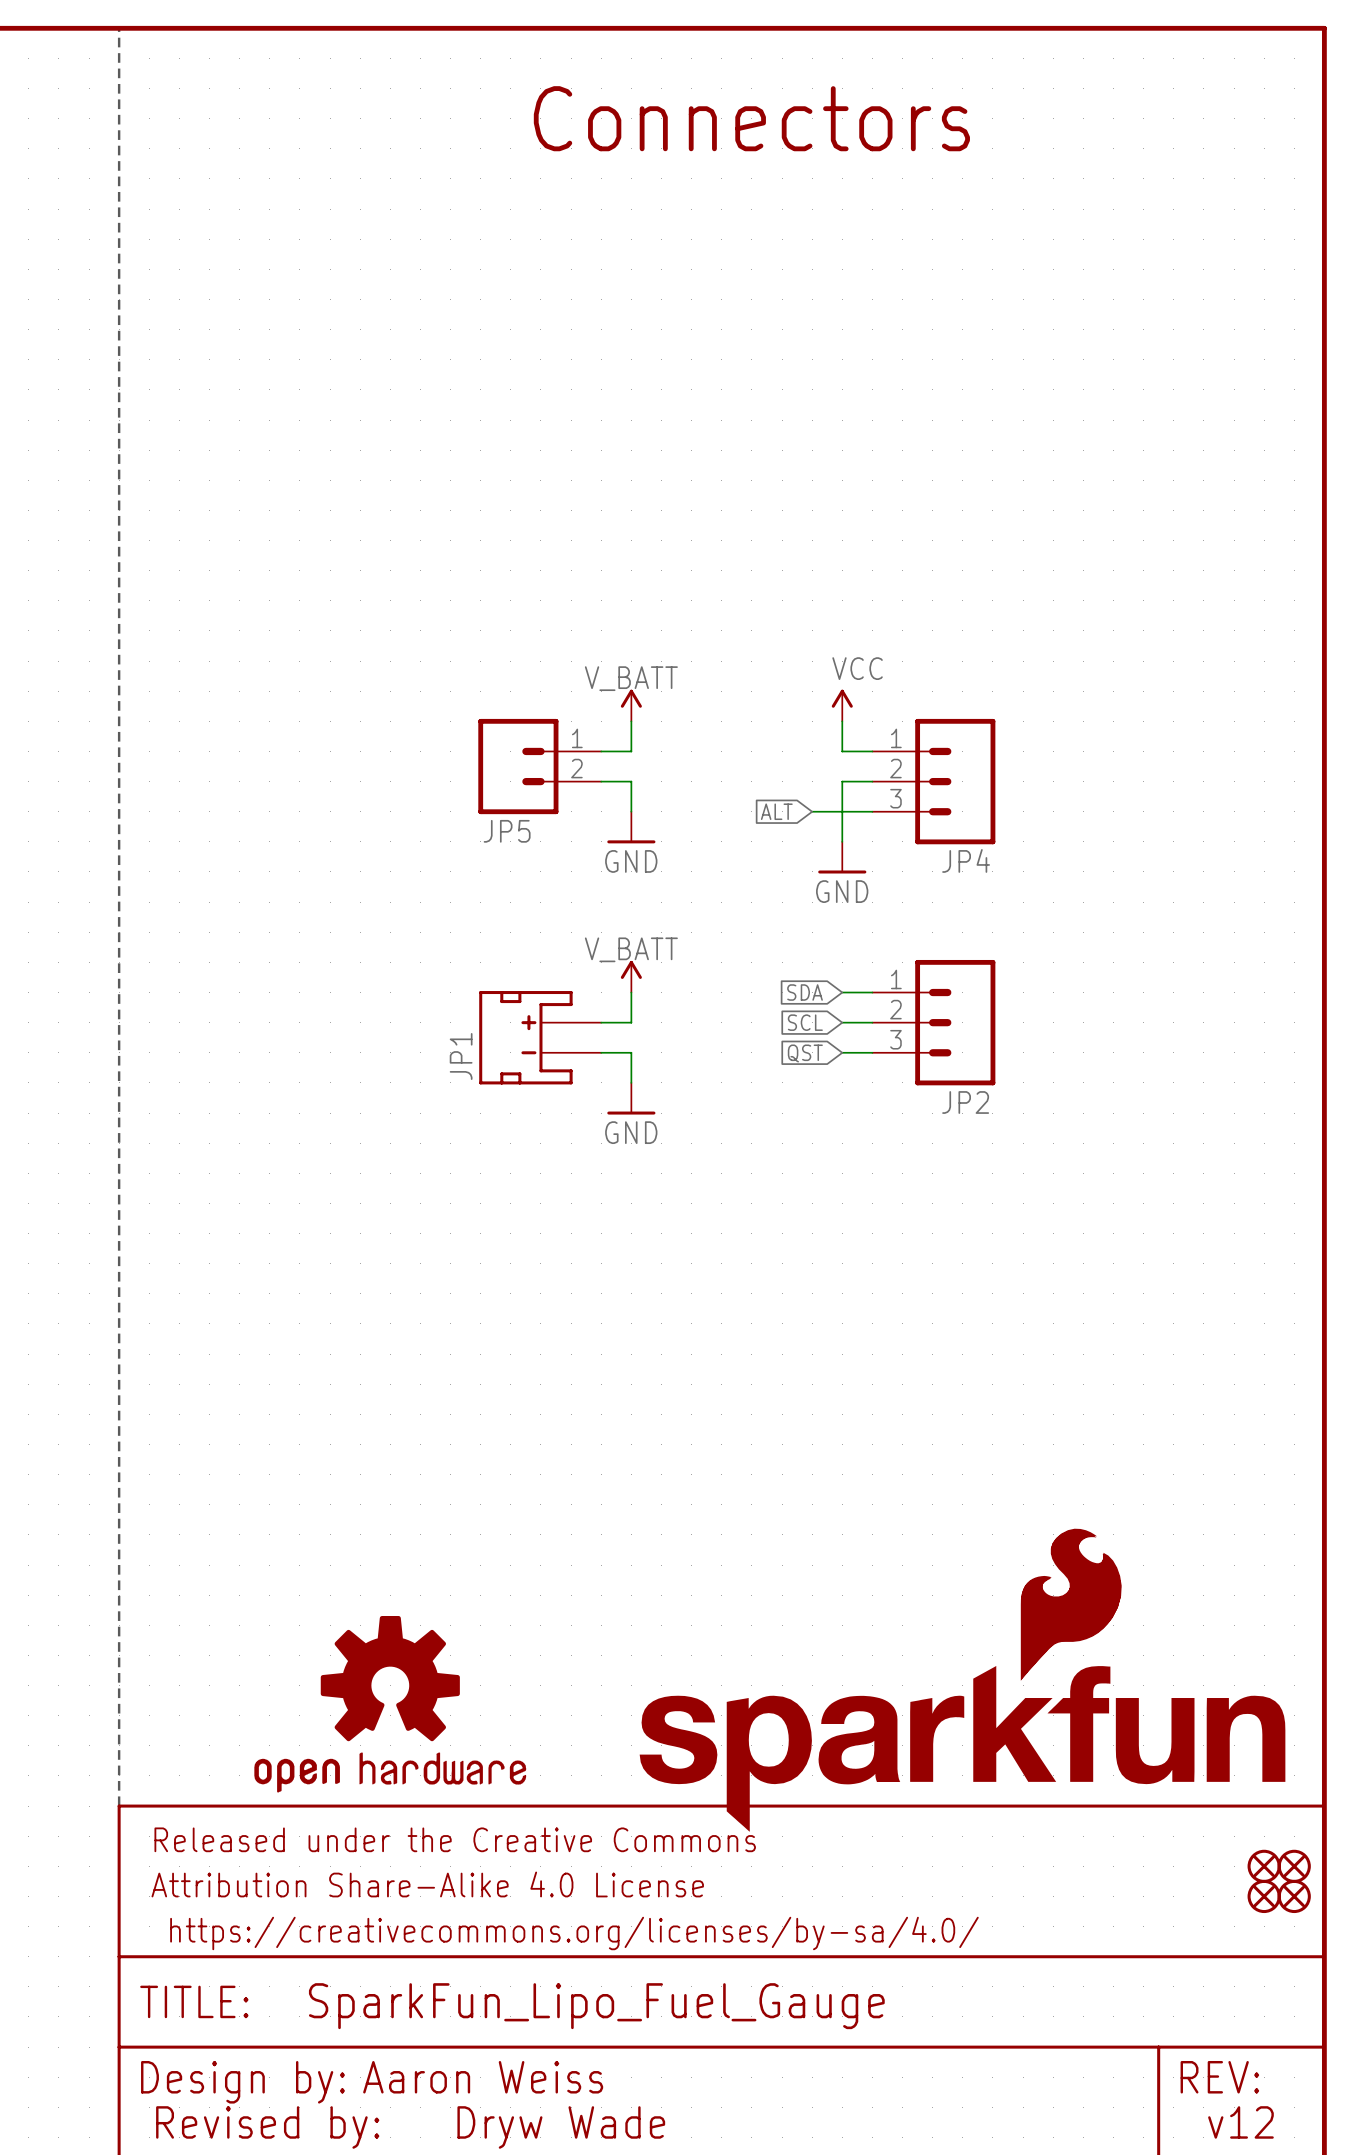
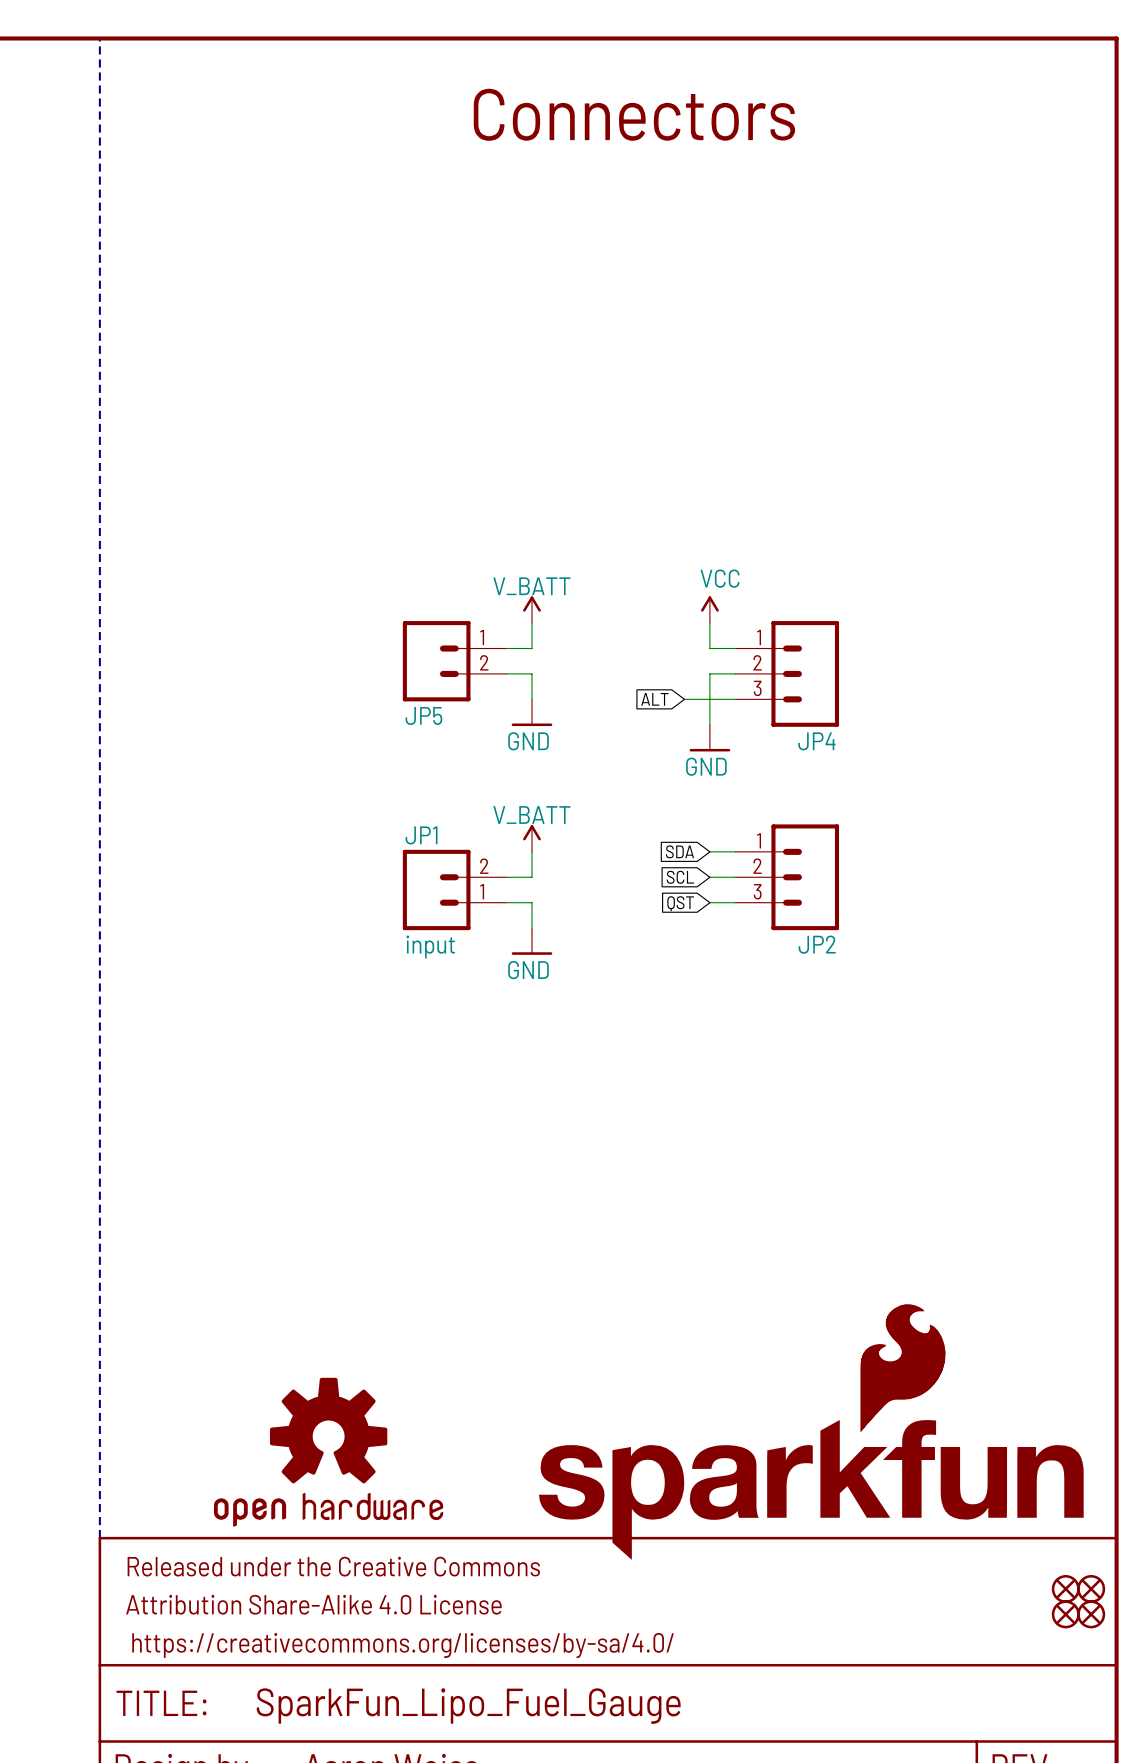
JP1 symbol: [479, 991, 602, 1085] -> [402, 849, 507, 931]
JP1 name position: JP1 (461, 1056) -> JP1 (421, 835)
JP1 value: none -> input (430, 946)

